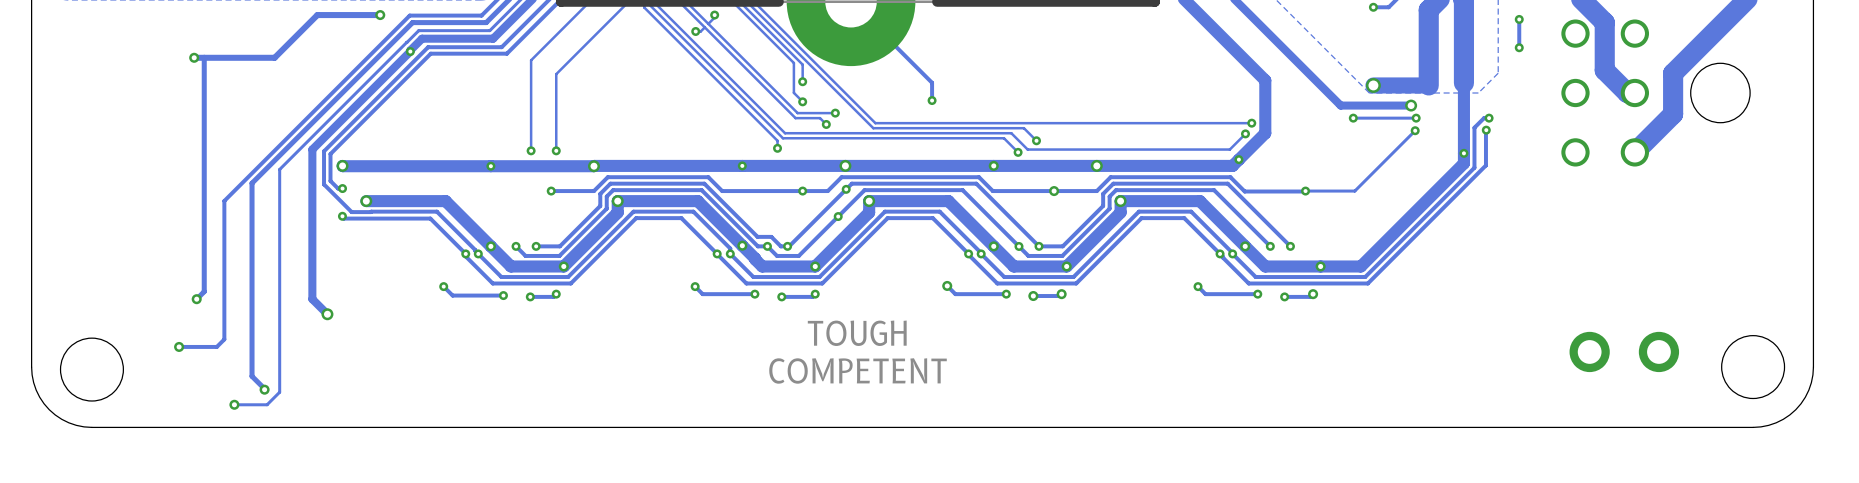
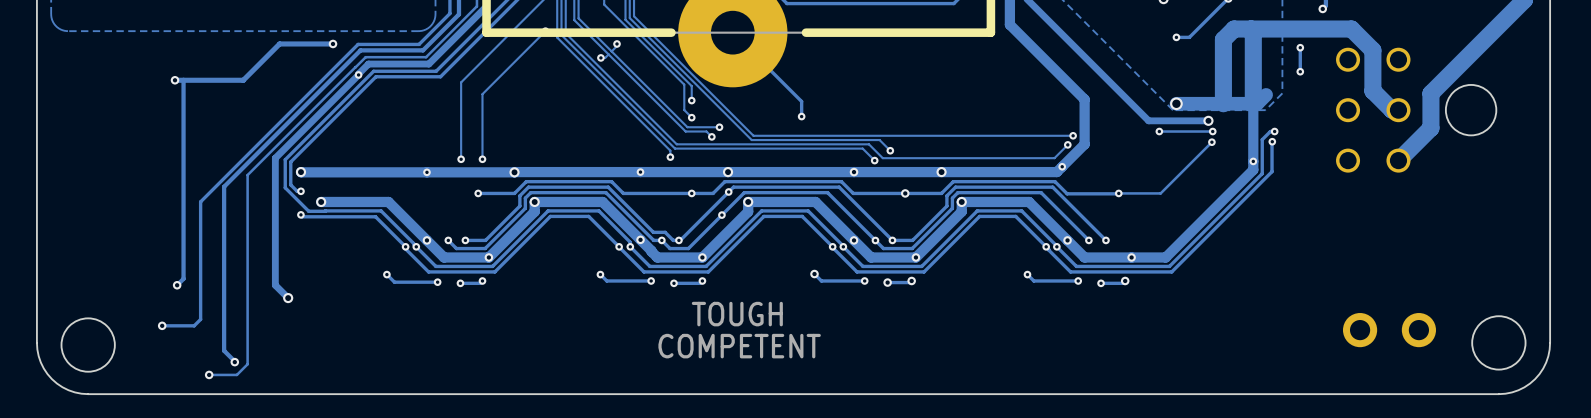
track: none -> (1266, 94) (1257, 103) (1223, 103)

